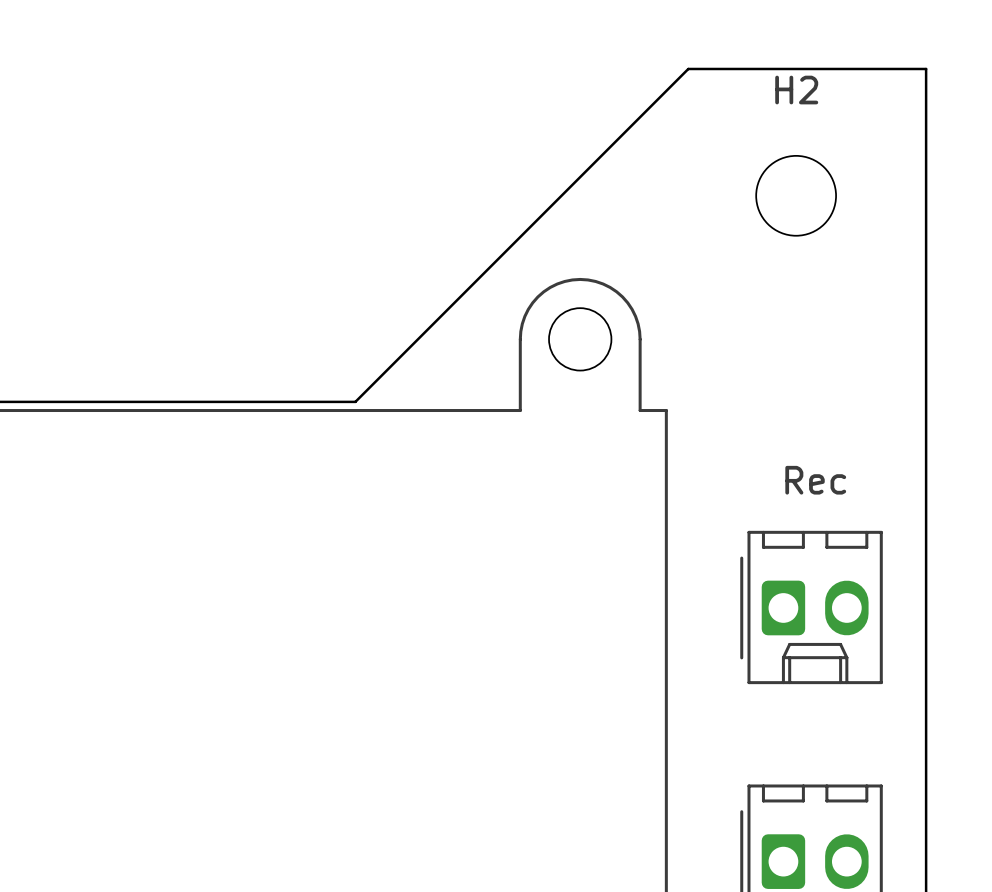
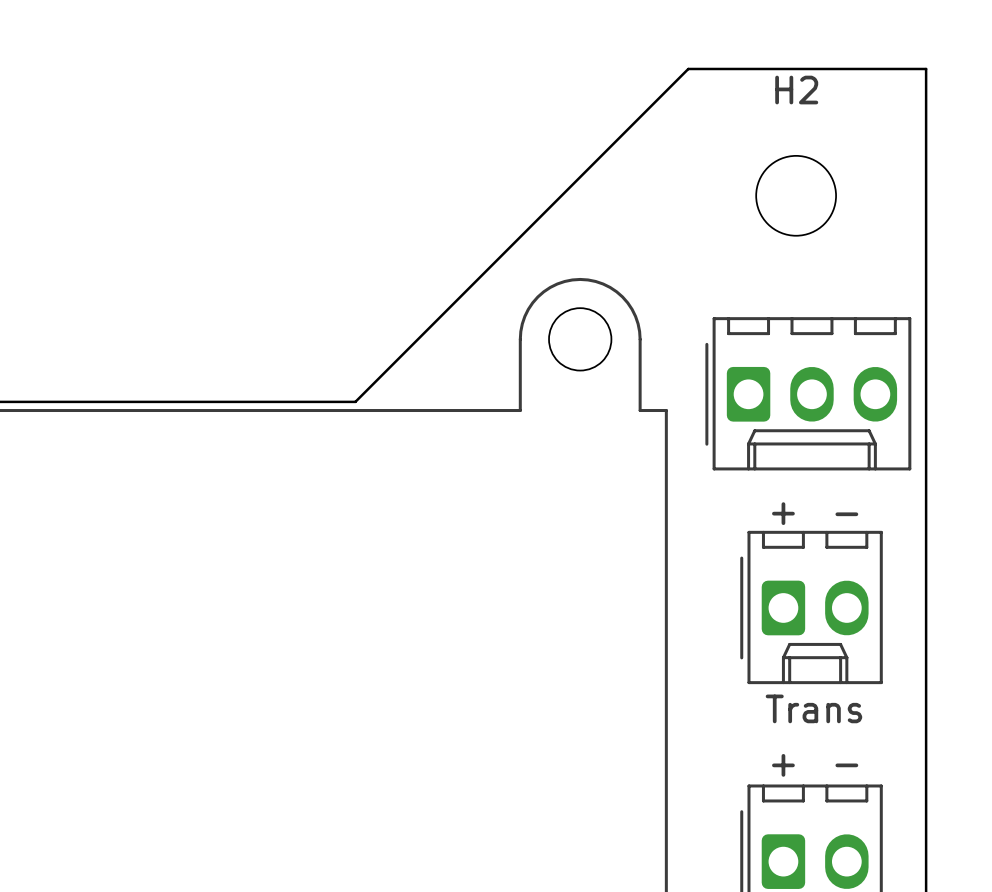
part: none -> (808, 393)
part value: Rec (815, 480) -> Trans (813, 708)
part text: none -> + (783, 513)
part text: none -> - (846, 514)
part text: none -> + (783, 765)
part text: none -> - (846, 765)

